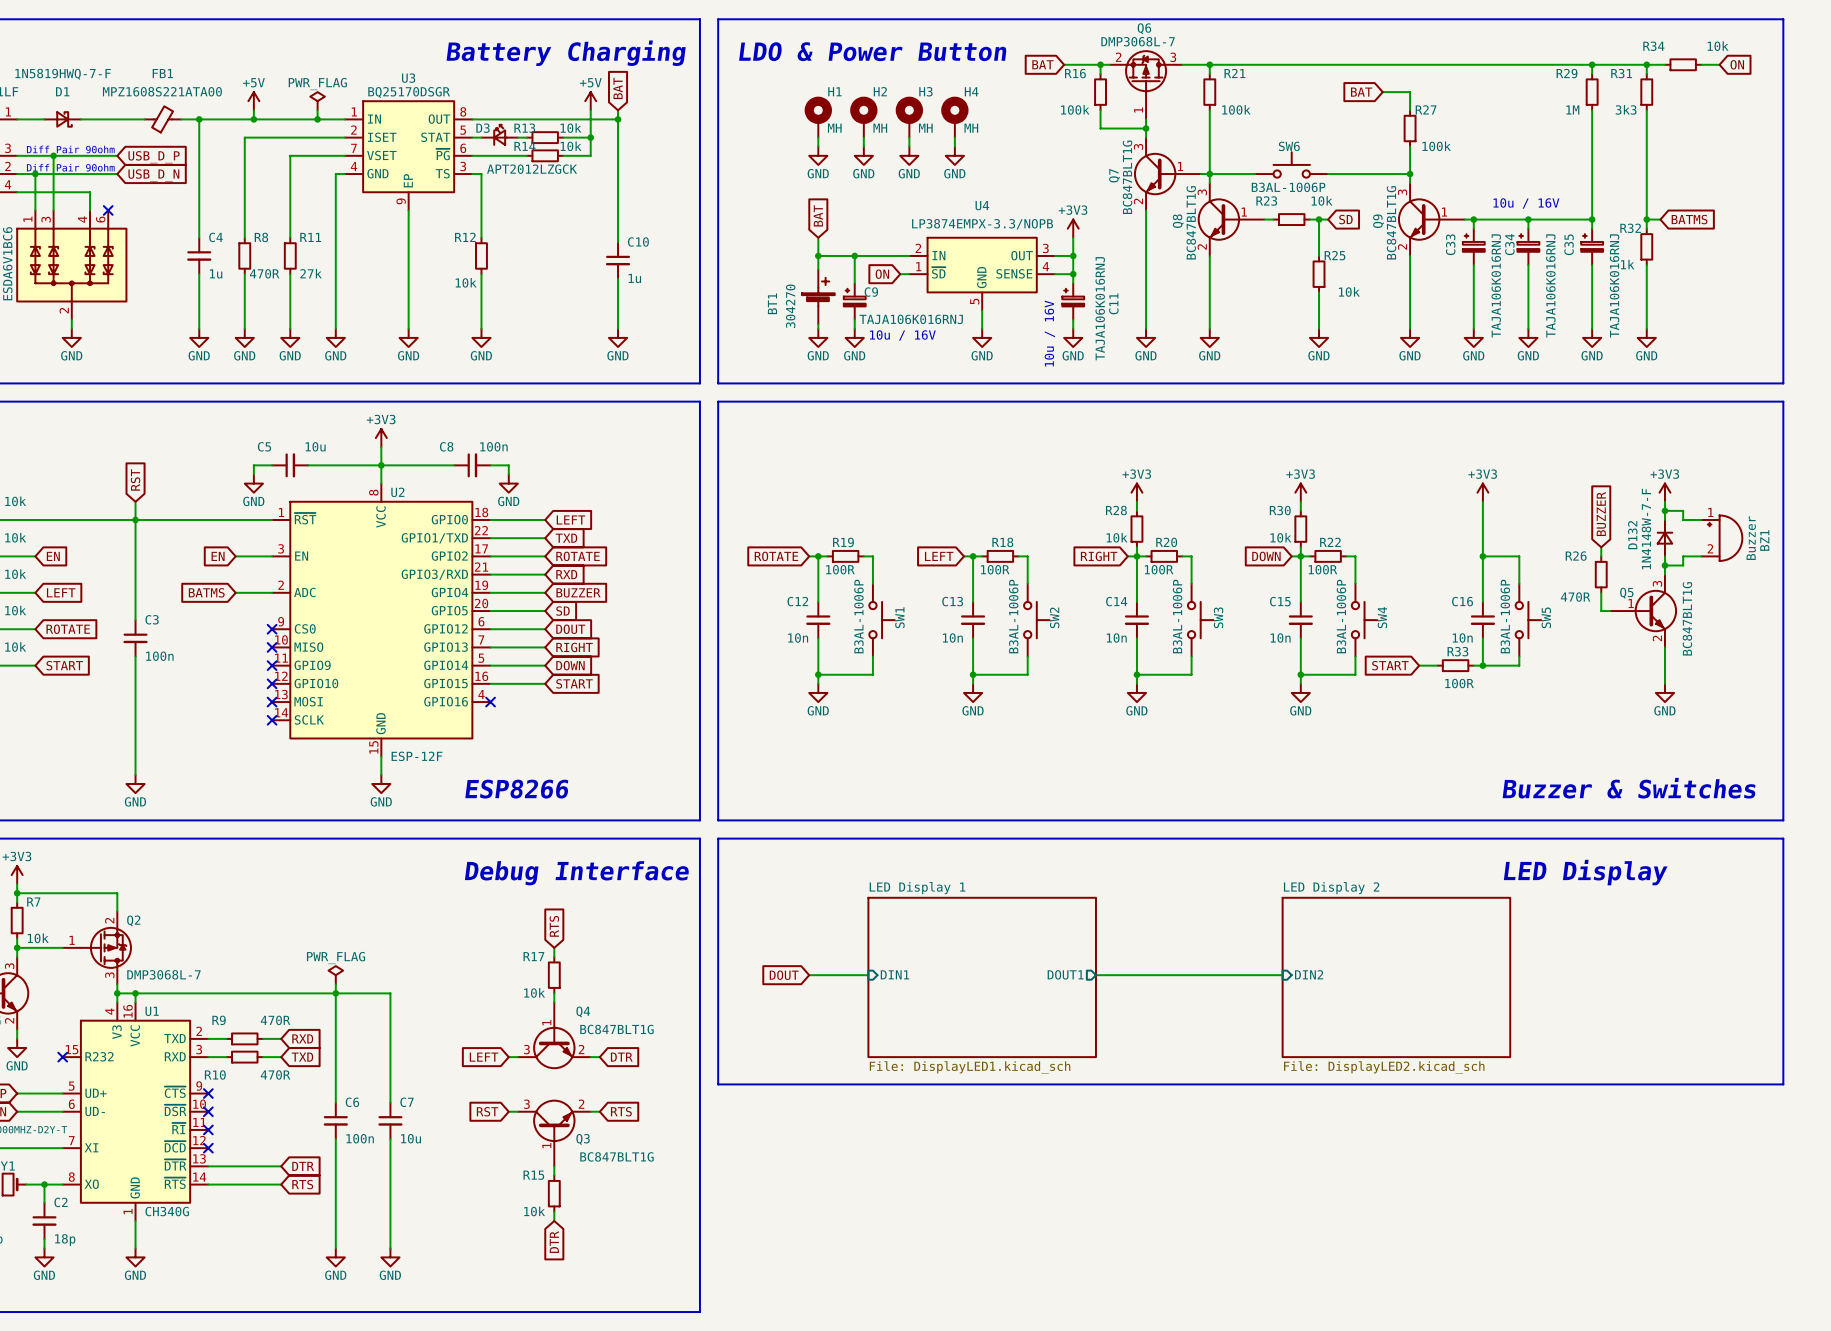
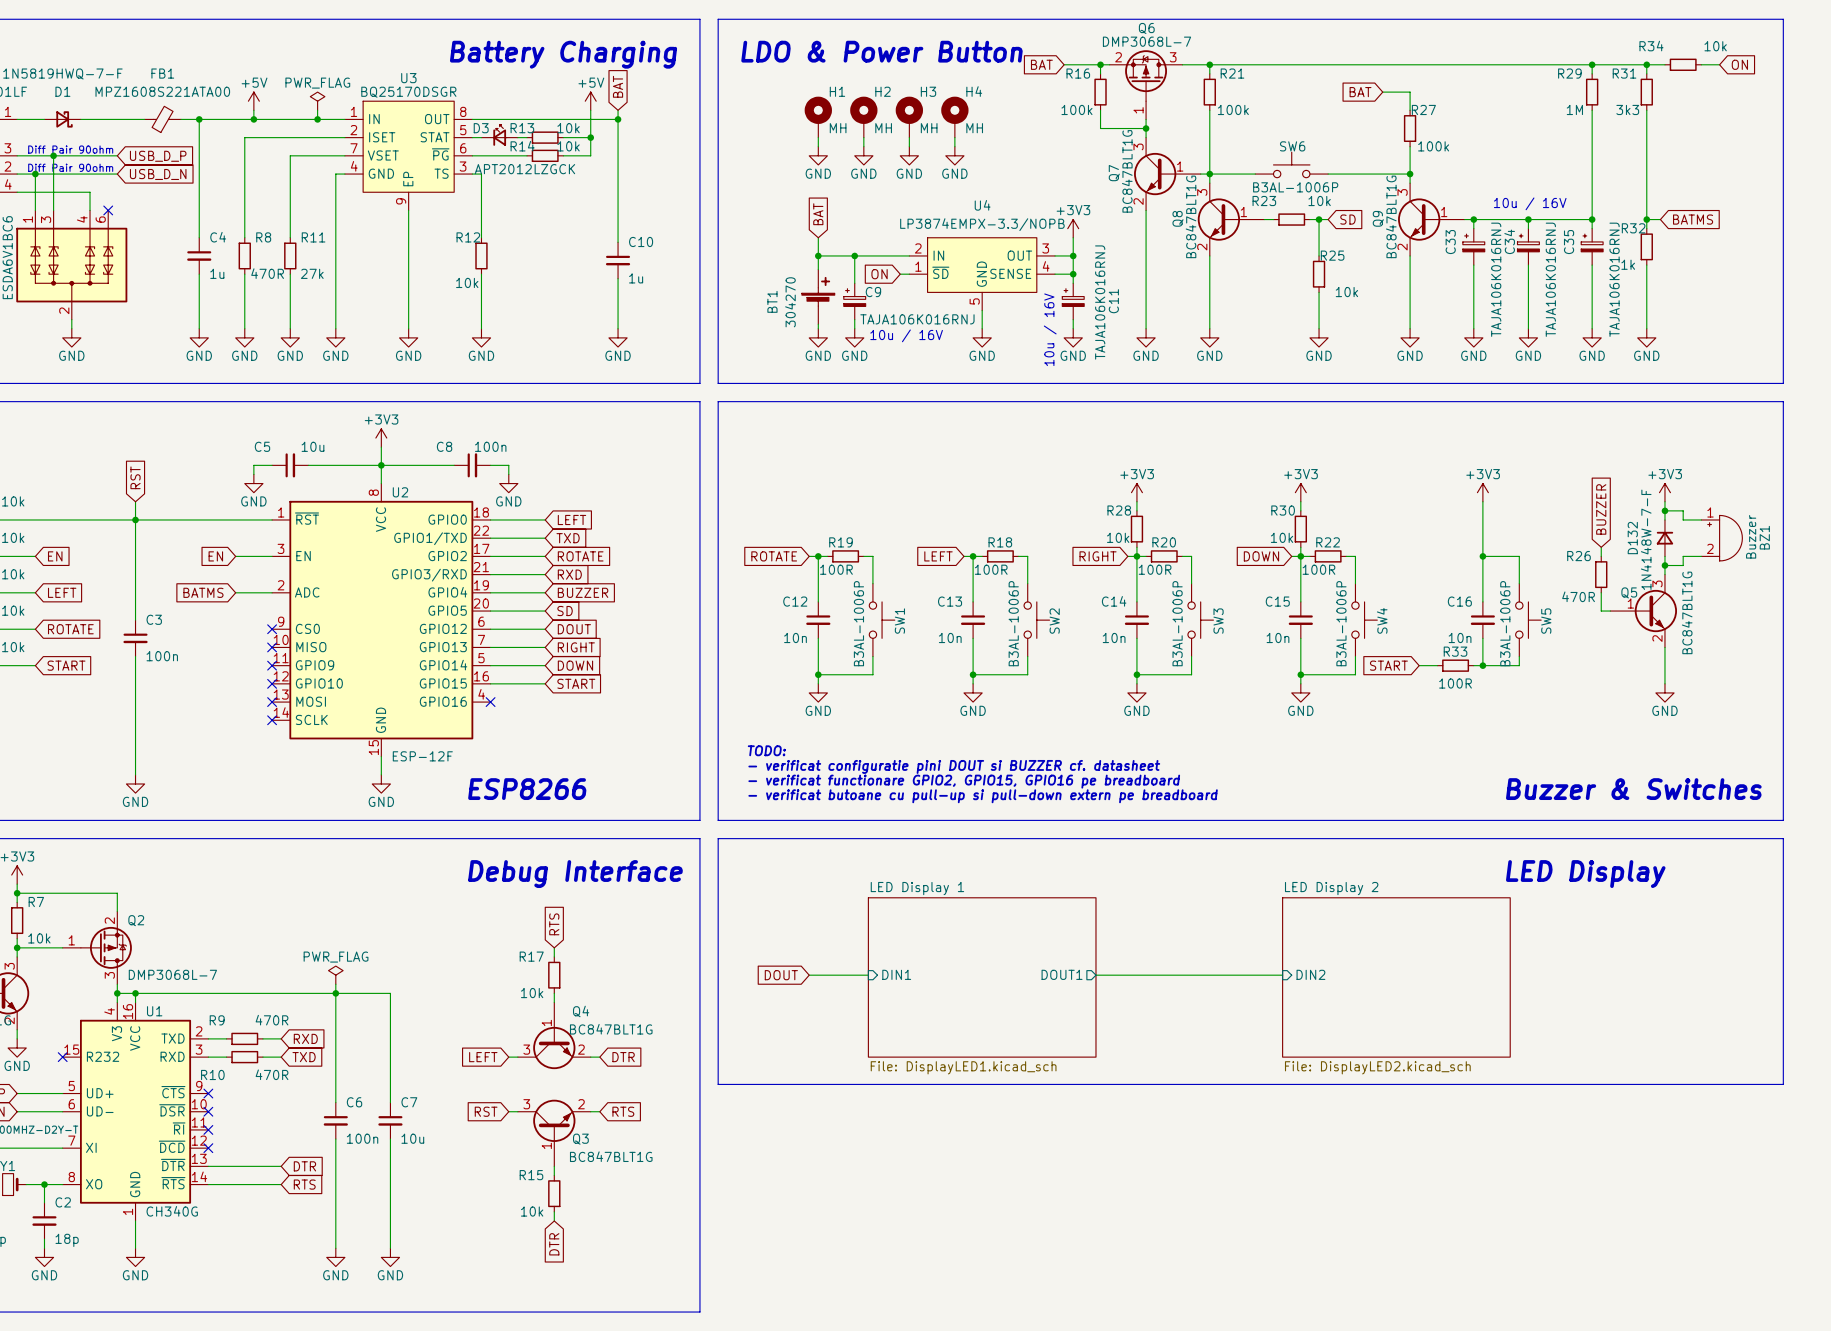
text: none -> TODO: (766, 750)
text: none -> - verificat configuratie pini DOUT si BUZZER cf. datasheet (954, 766)
text: none -> - verificat functionare GPIO2, GPIO15, GPIO16 pe breadboard (964, 781)
text: none -> - verificat butoane cu pull-up si pull-down extern pe breadboard (983, 796)

